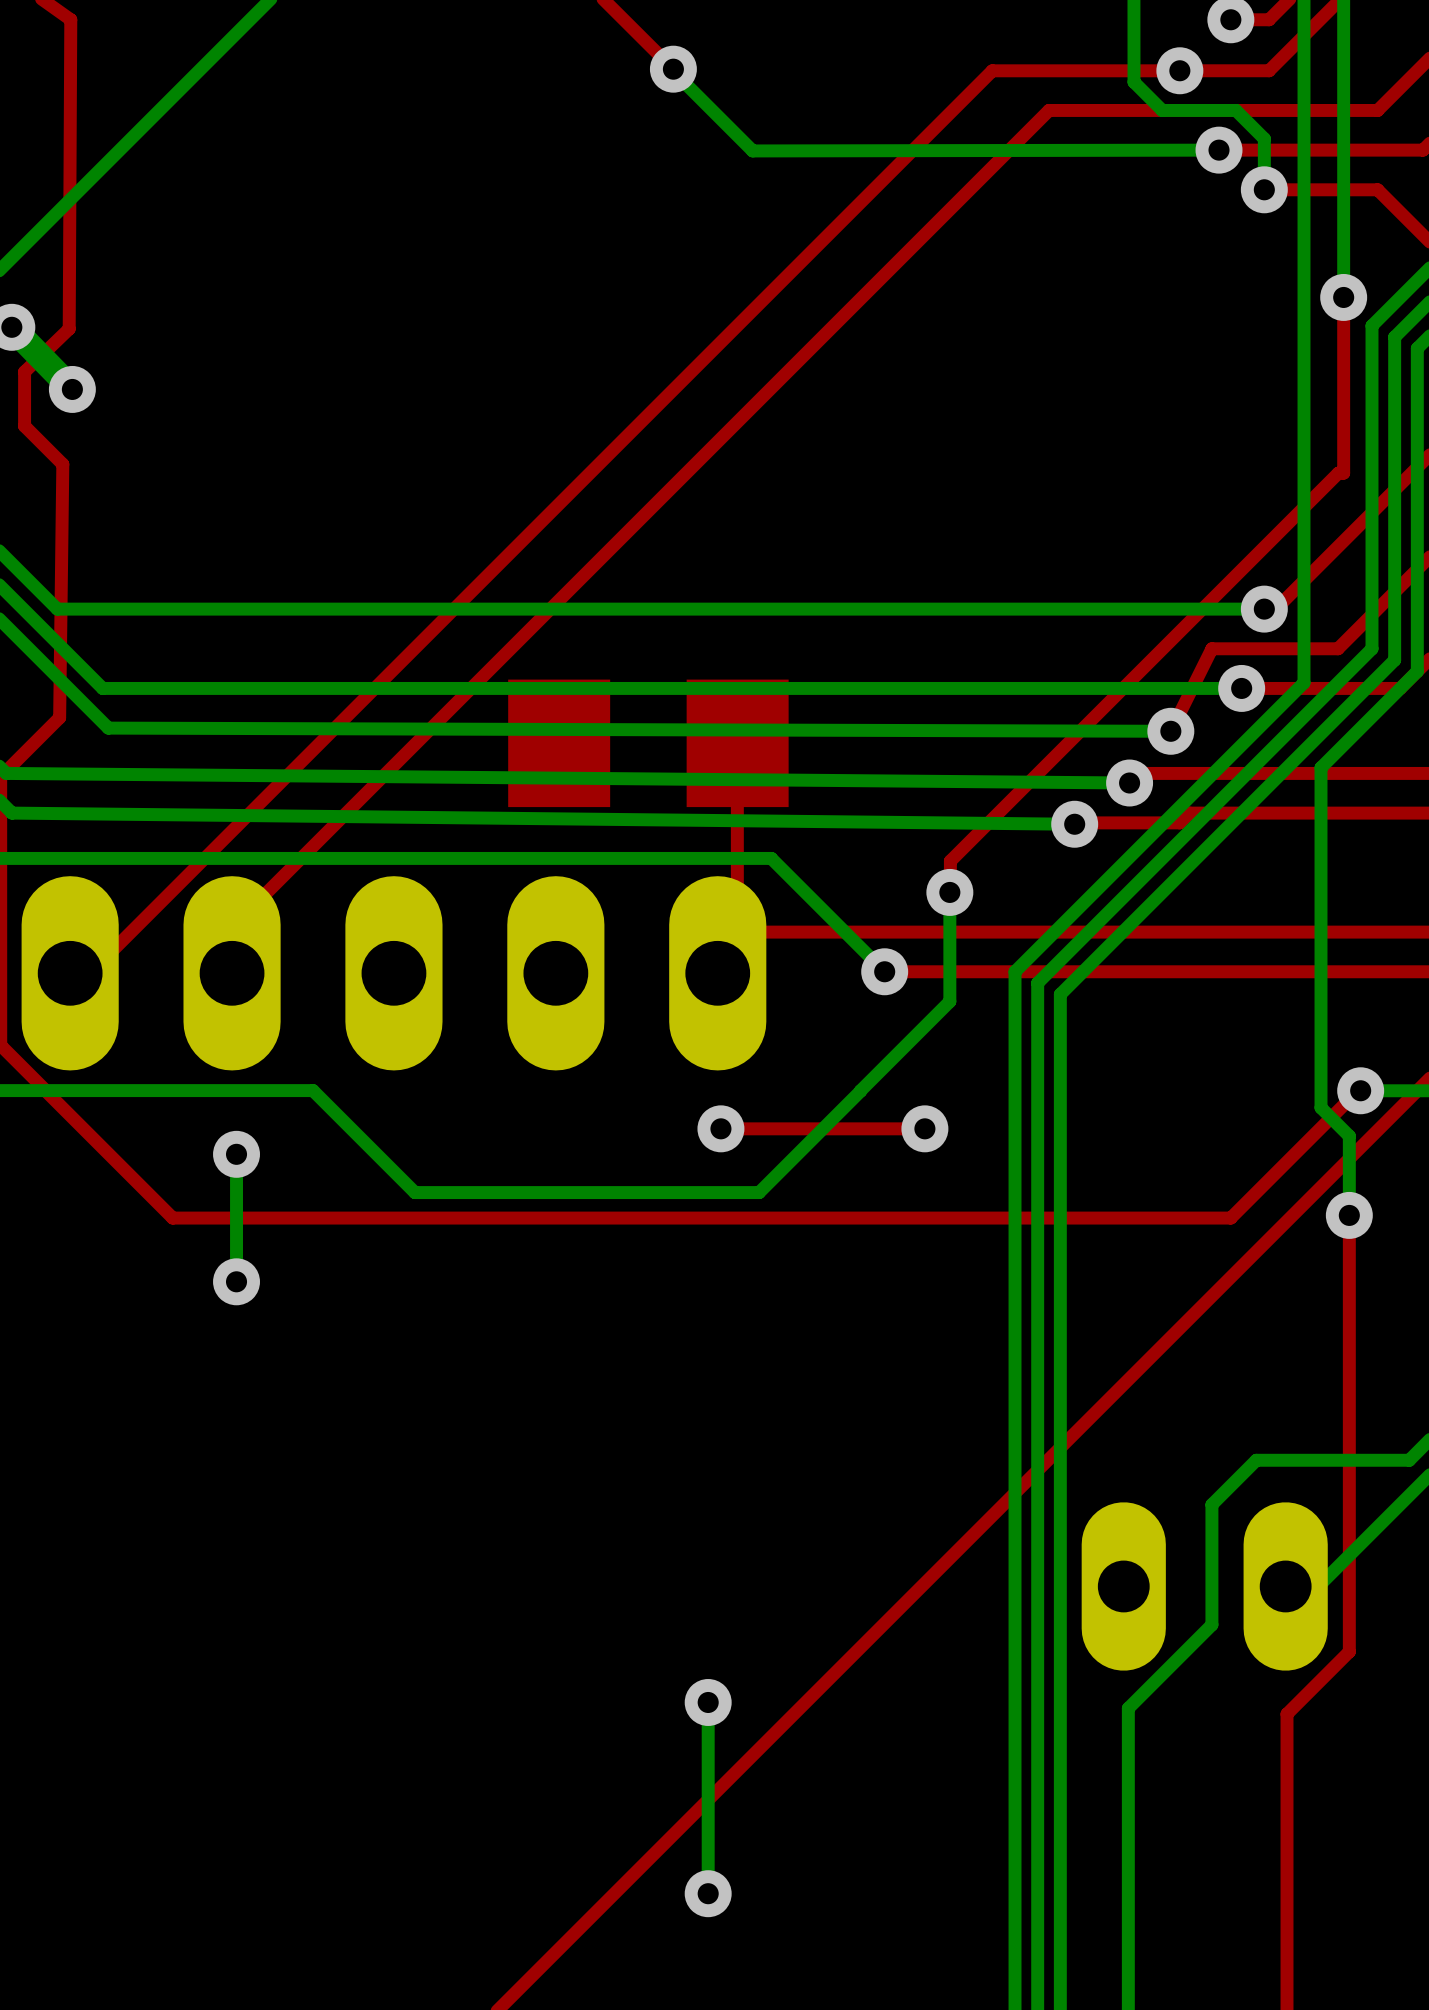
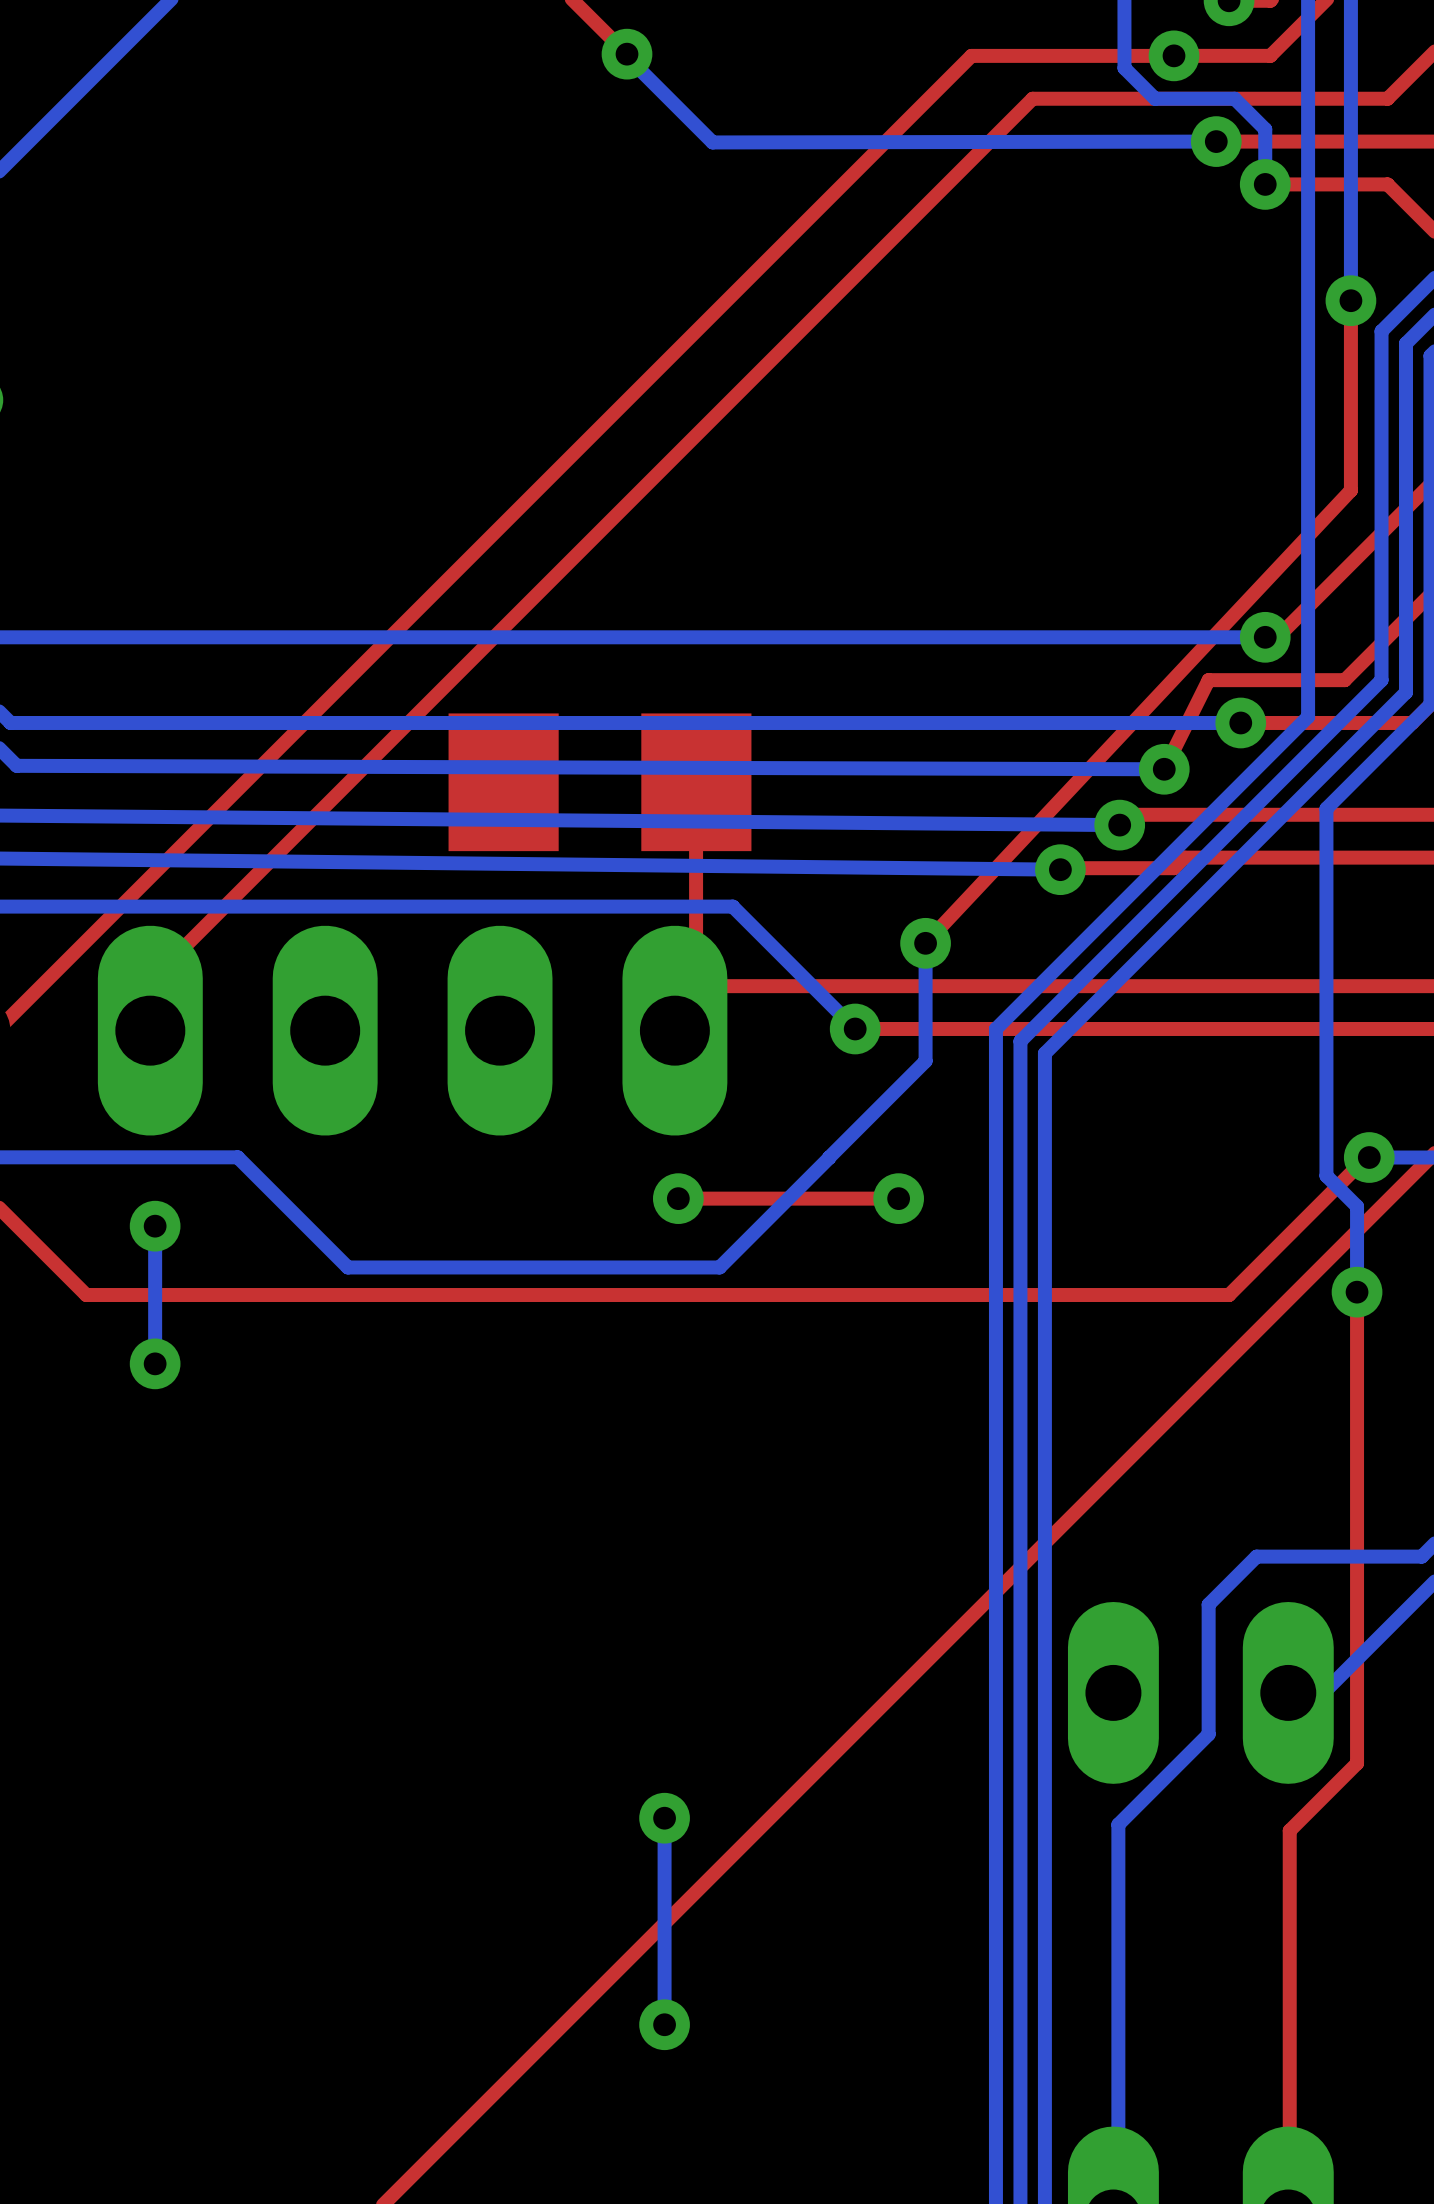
top track: (1343, 473) (1338, 473) (950, 861) (950, 891) -> (1350, 490) (925, 943)

